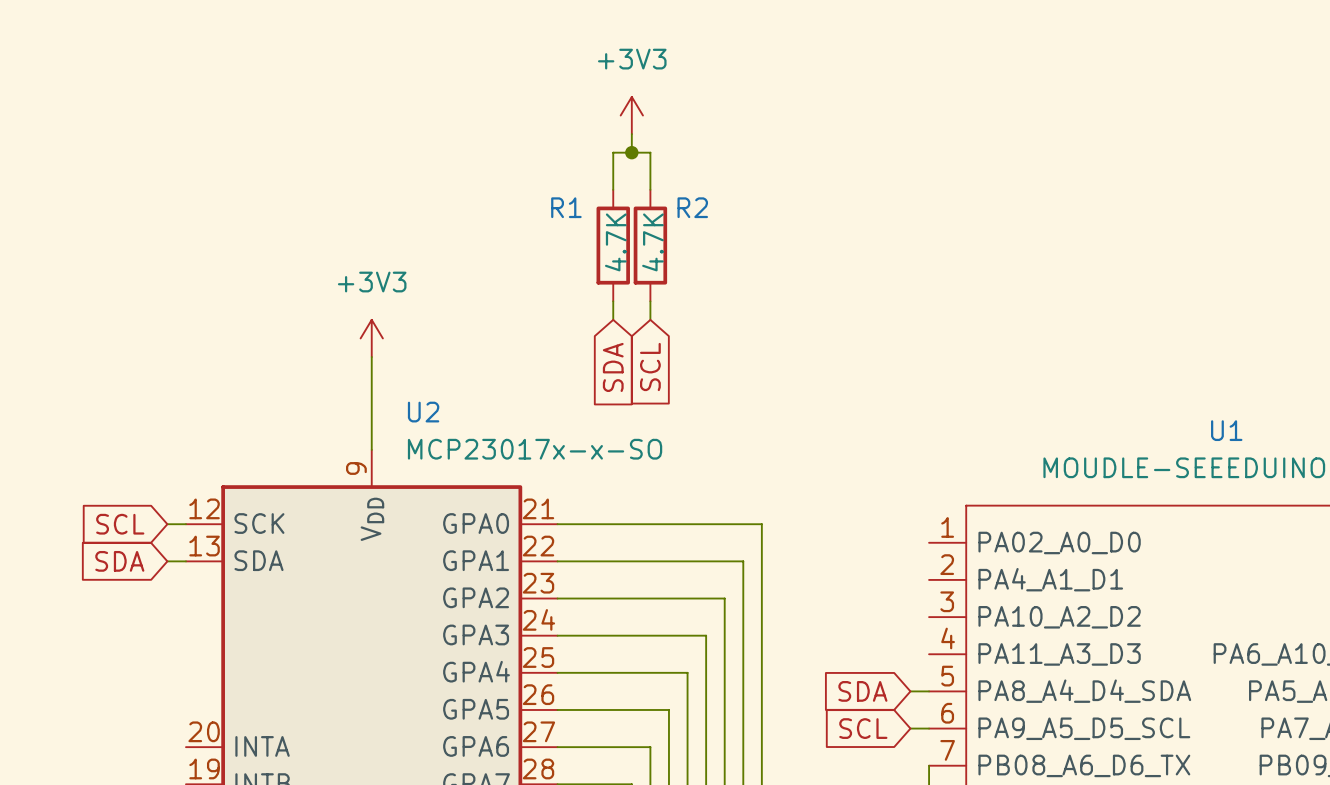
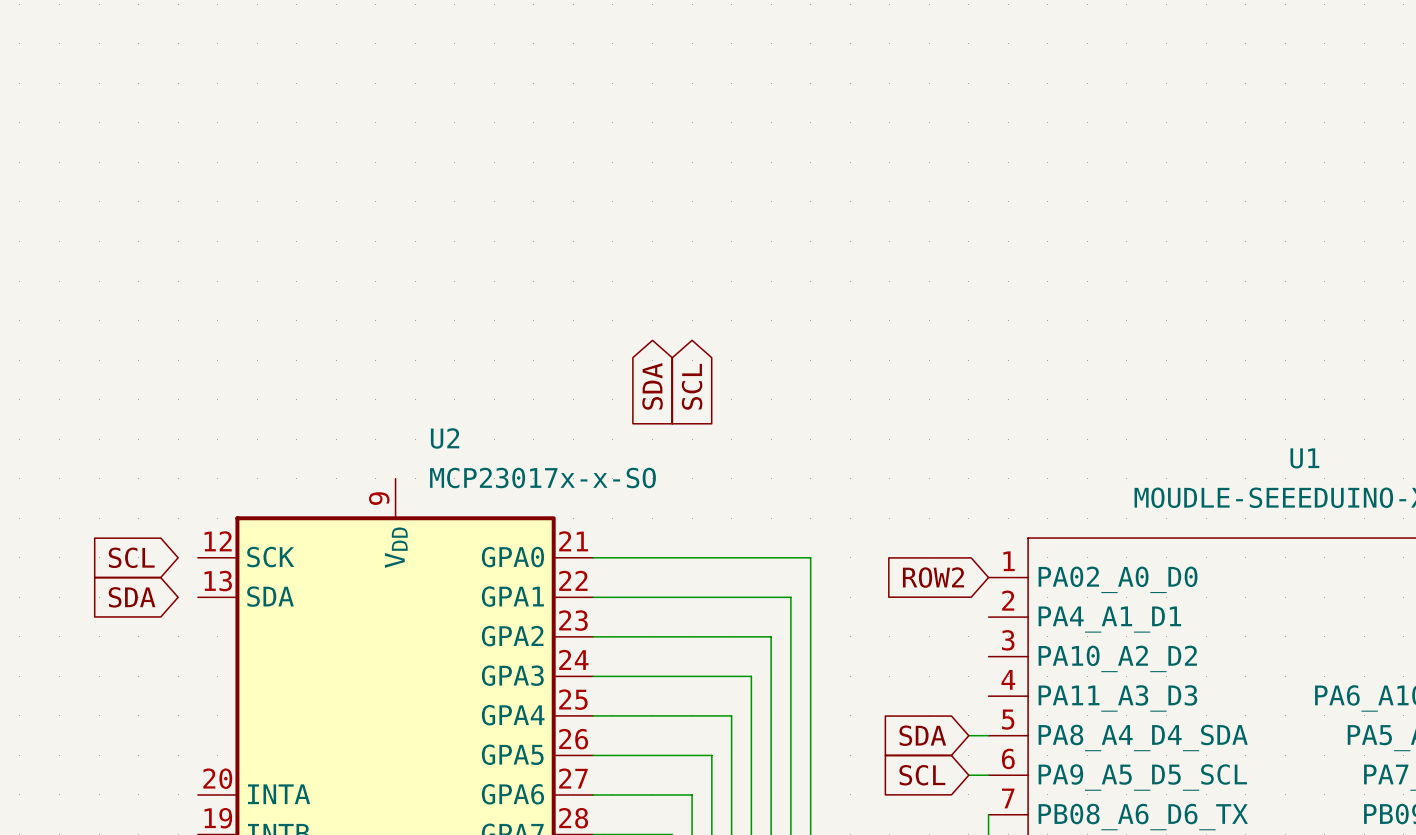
power symbol: +3V3 (631, 115) -> none
wire: (631, 134) (631, 152) -> none
junction: (631, 152) -> none
wire: (613, 189) (613, 152) (650, 152) (650, 189) -> none
R1: 4.7K (613, 245) -> none
R2: 4.7K (650, 245) -> none
wire: (613, 301) (613, 319) -> none
wire: (650, 301) (650, 319) -> none
power symbol: +3V3 (371, 338) -> none
wire: (371, 357) (371, 449) -> none
wire: (167, 524) (185, 524) -> none
global label: none -> ROW2 (933, 577)
wire: (167, 561) (185, 561) -> none

